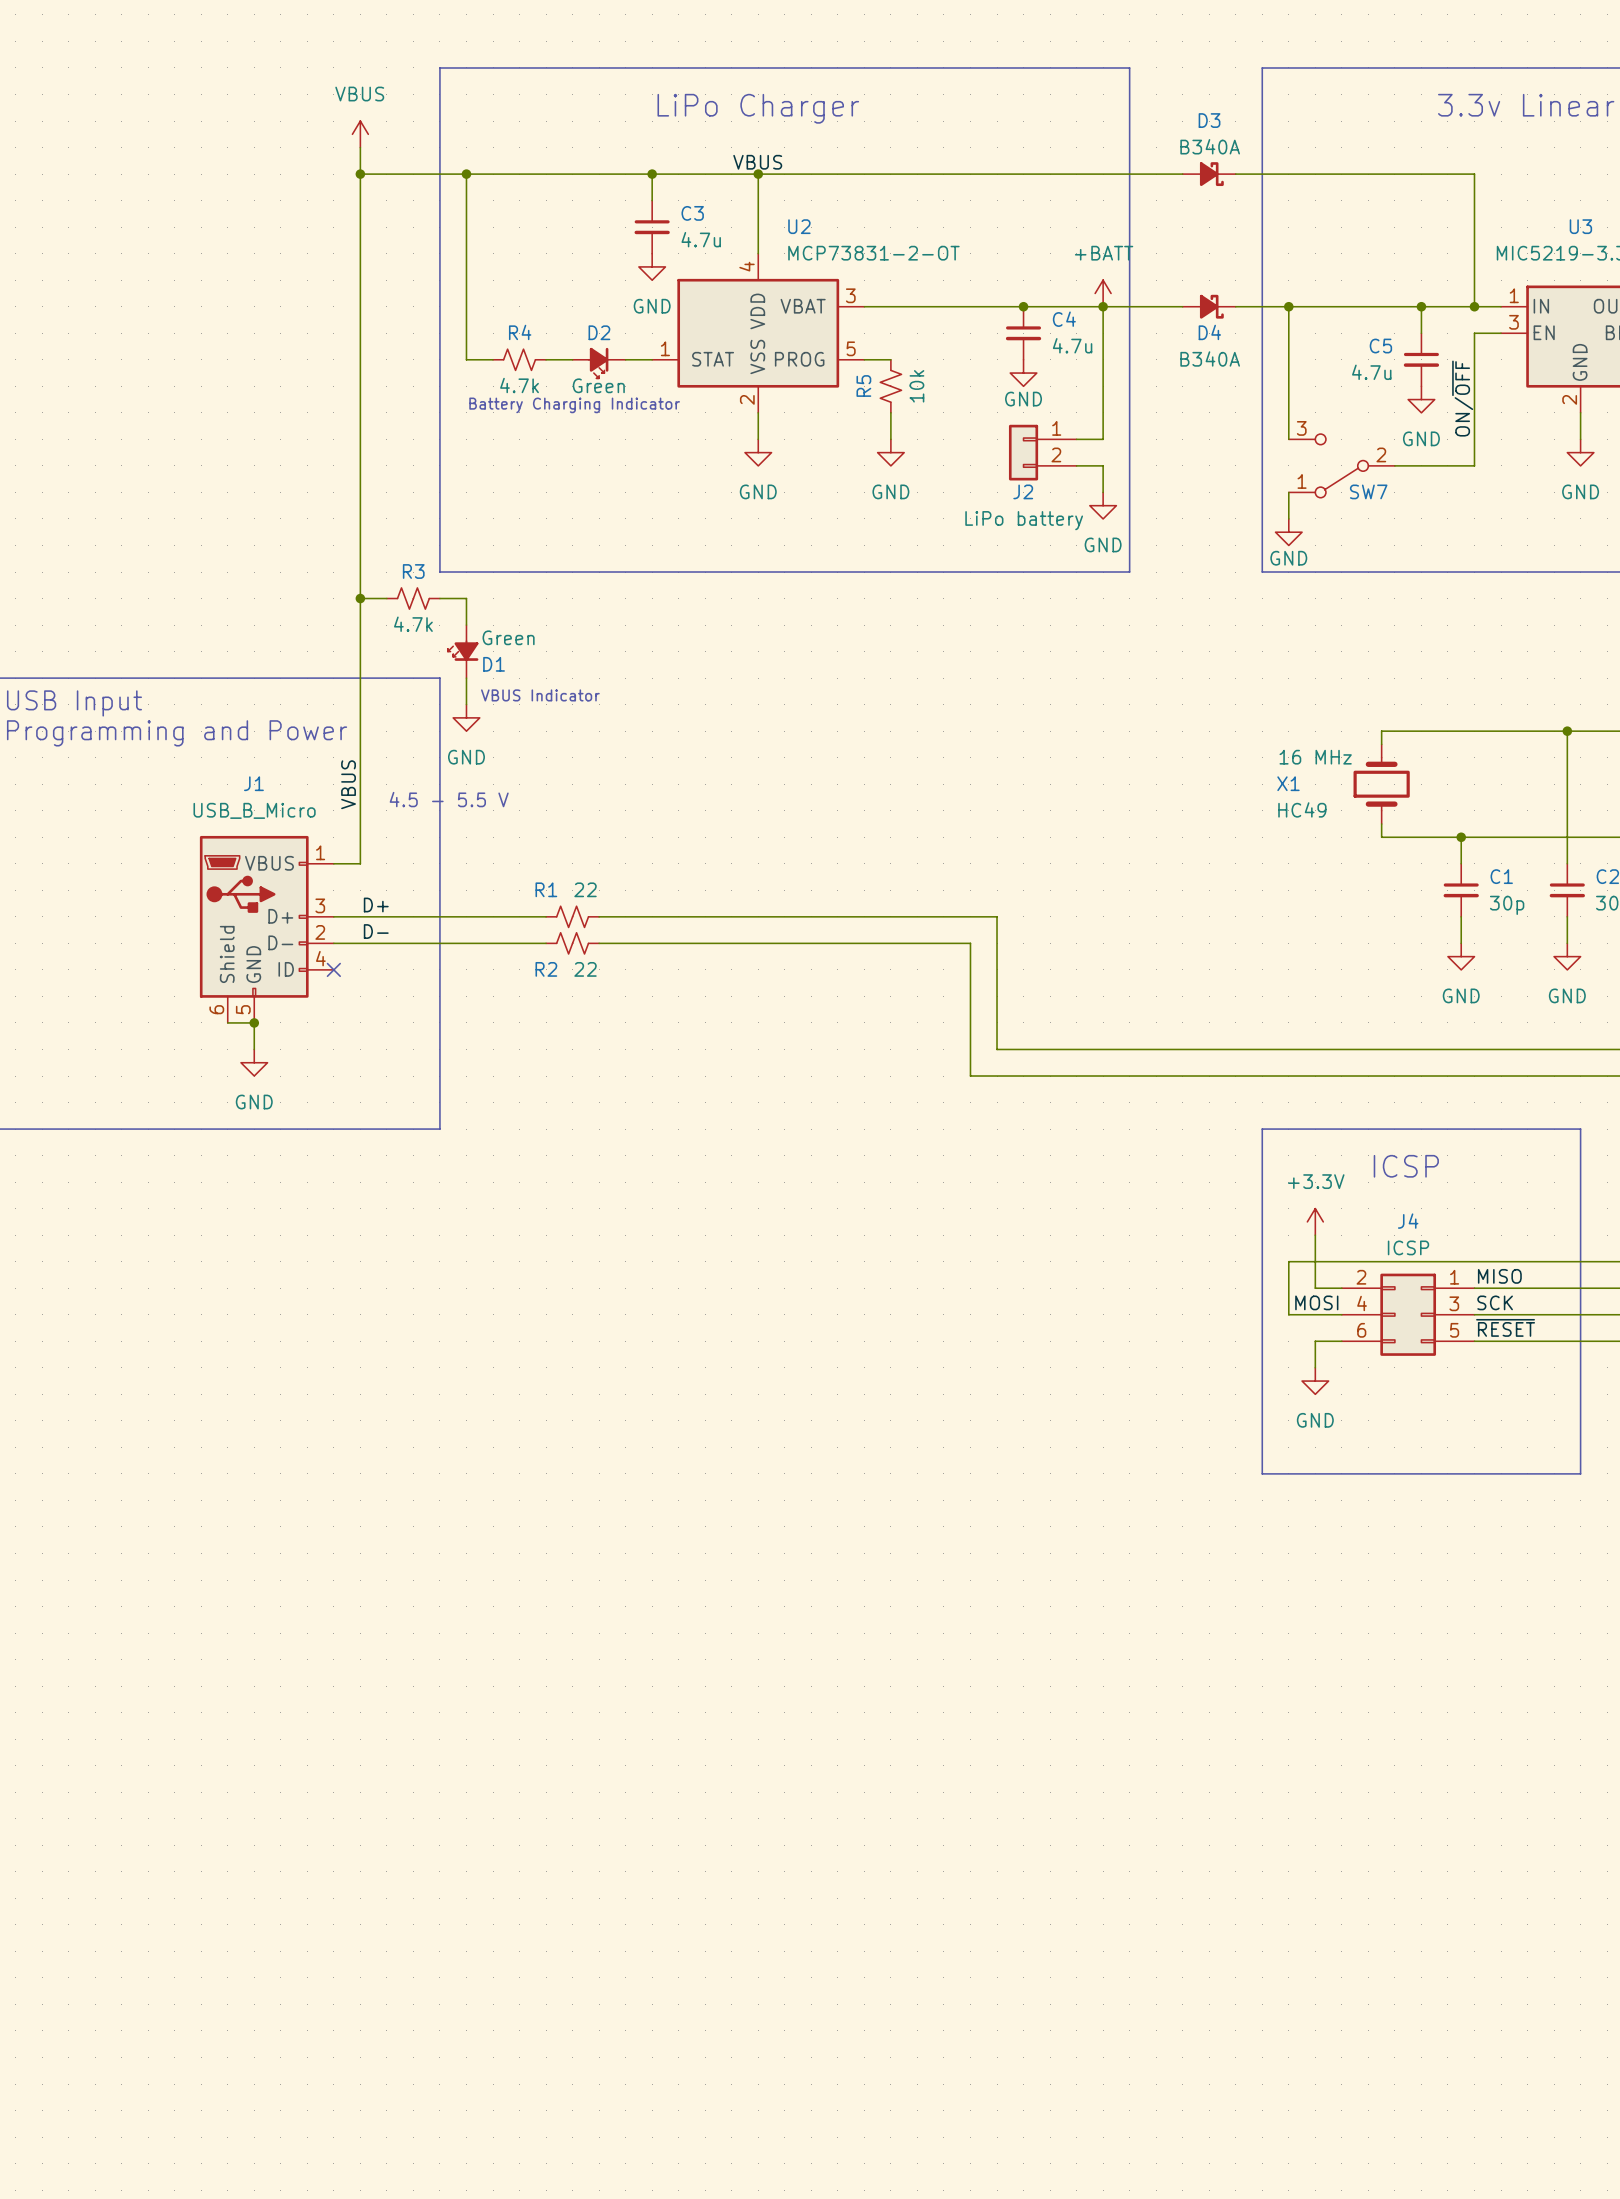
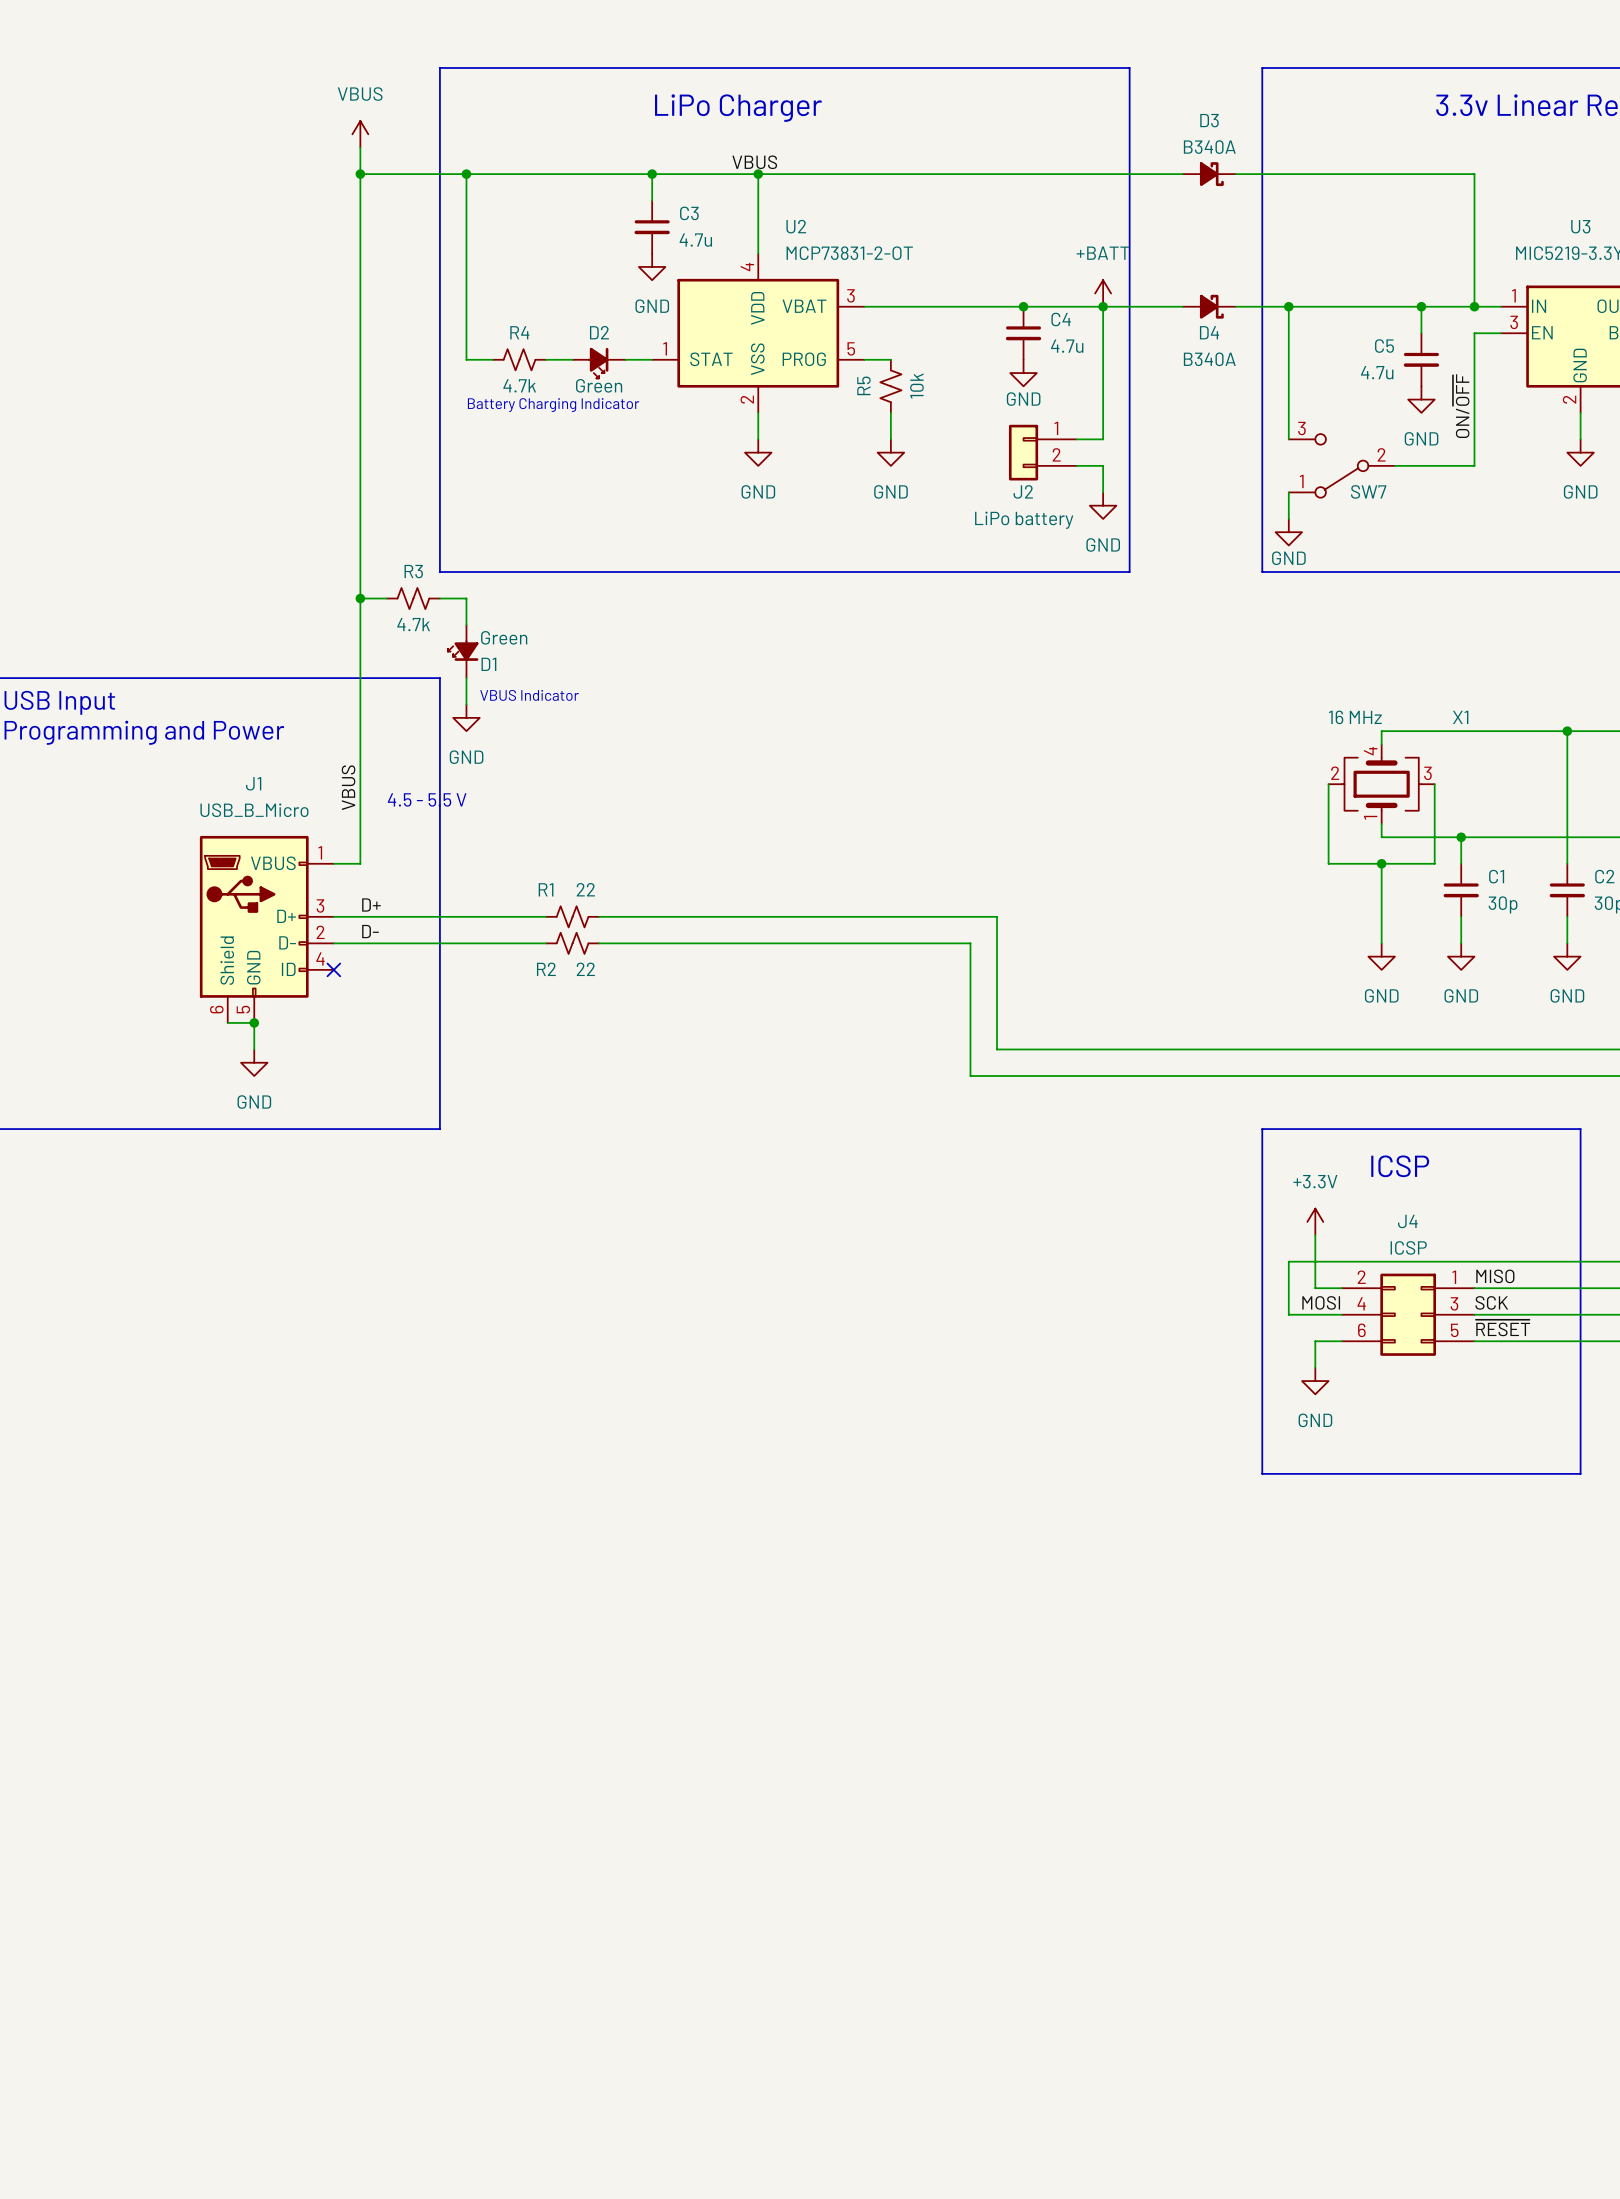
X1 symbol: [1353, 744, 1410, 825] -> [1328, 744, 1435, 825]
X1 value position: 16 MHz (1315, 757) -> 16 MHz (1355, 717)
X1 name position: X1 (1288, 783) -> X1 (1460, 717)
wire: none -> (1328, 784) (1328, 863) (1434, 863) (1434, 784)
X1 text: HC49 (1302, 809) -> none
wire: none -> (1381, 863) (1381, 943)
junction: none -> (1381, 863)
power symbol: none -> GND (1381, 956)

